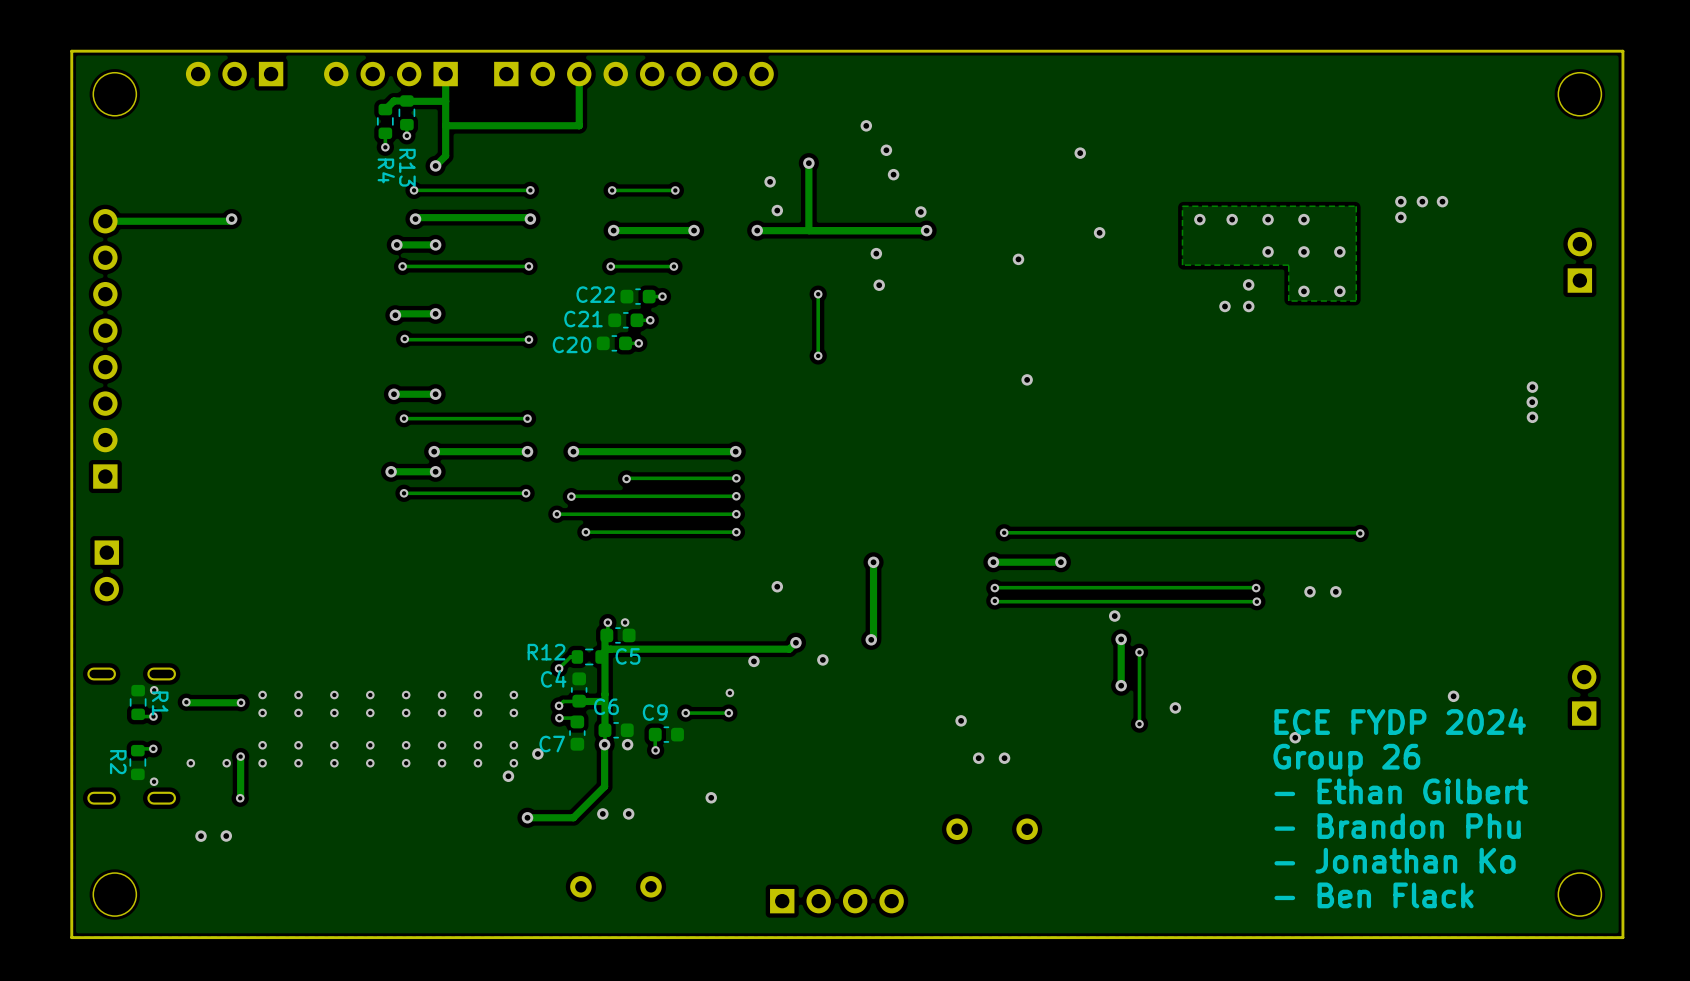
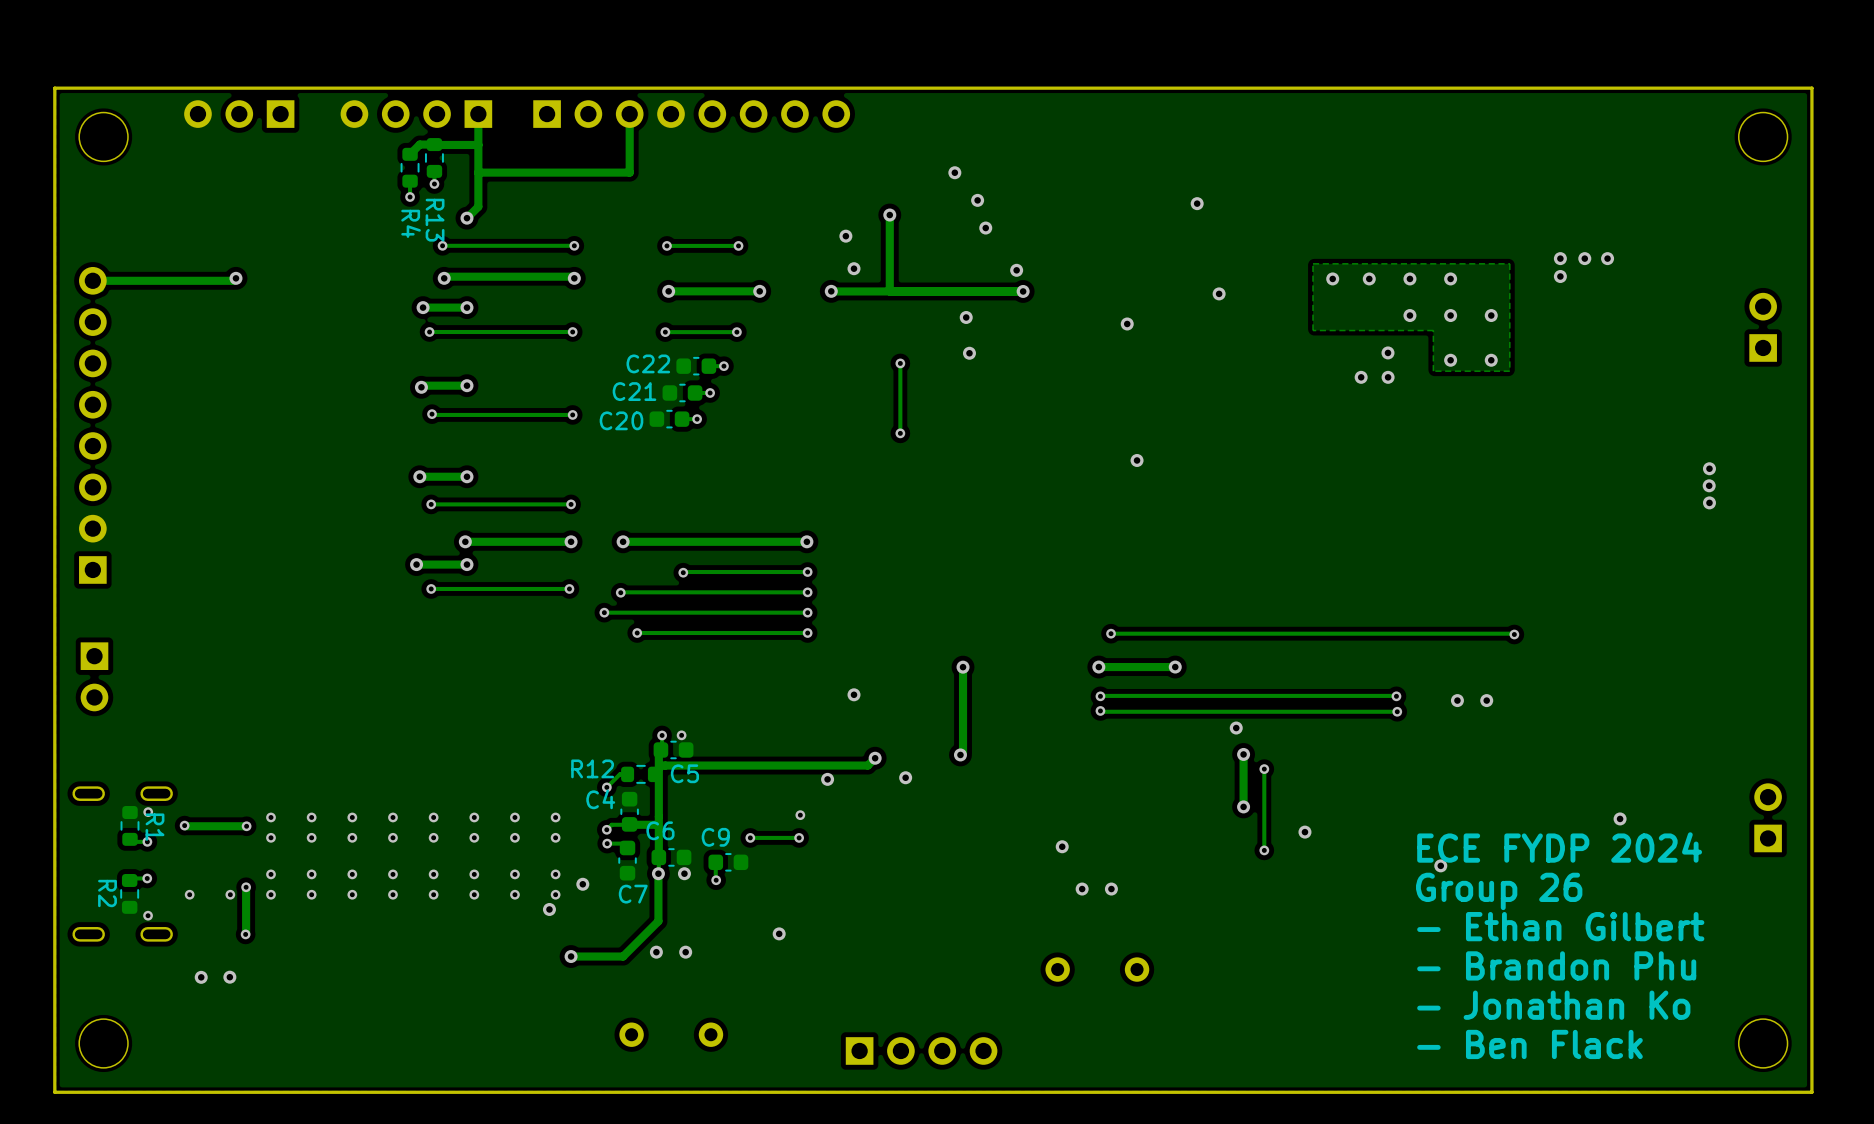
C7 name position: C7 (552, 744) -> C7 (633, 894)

